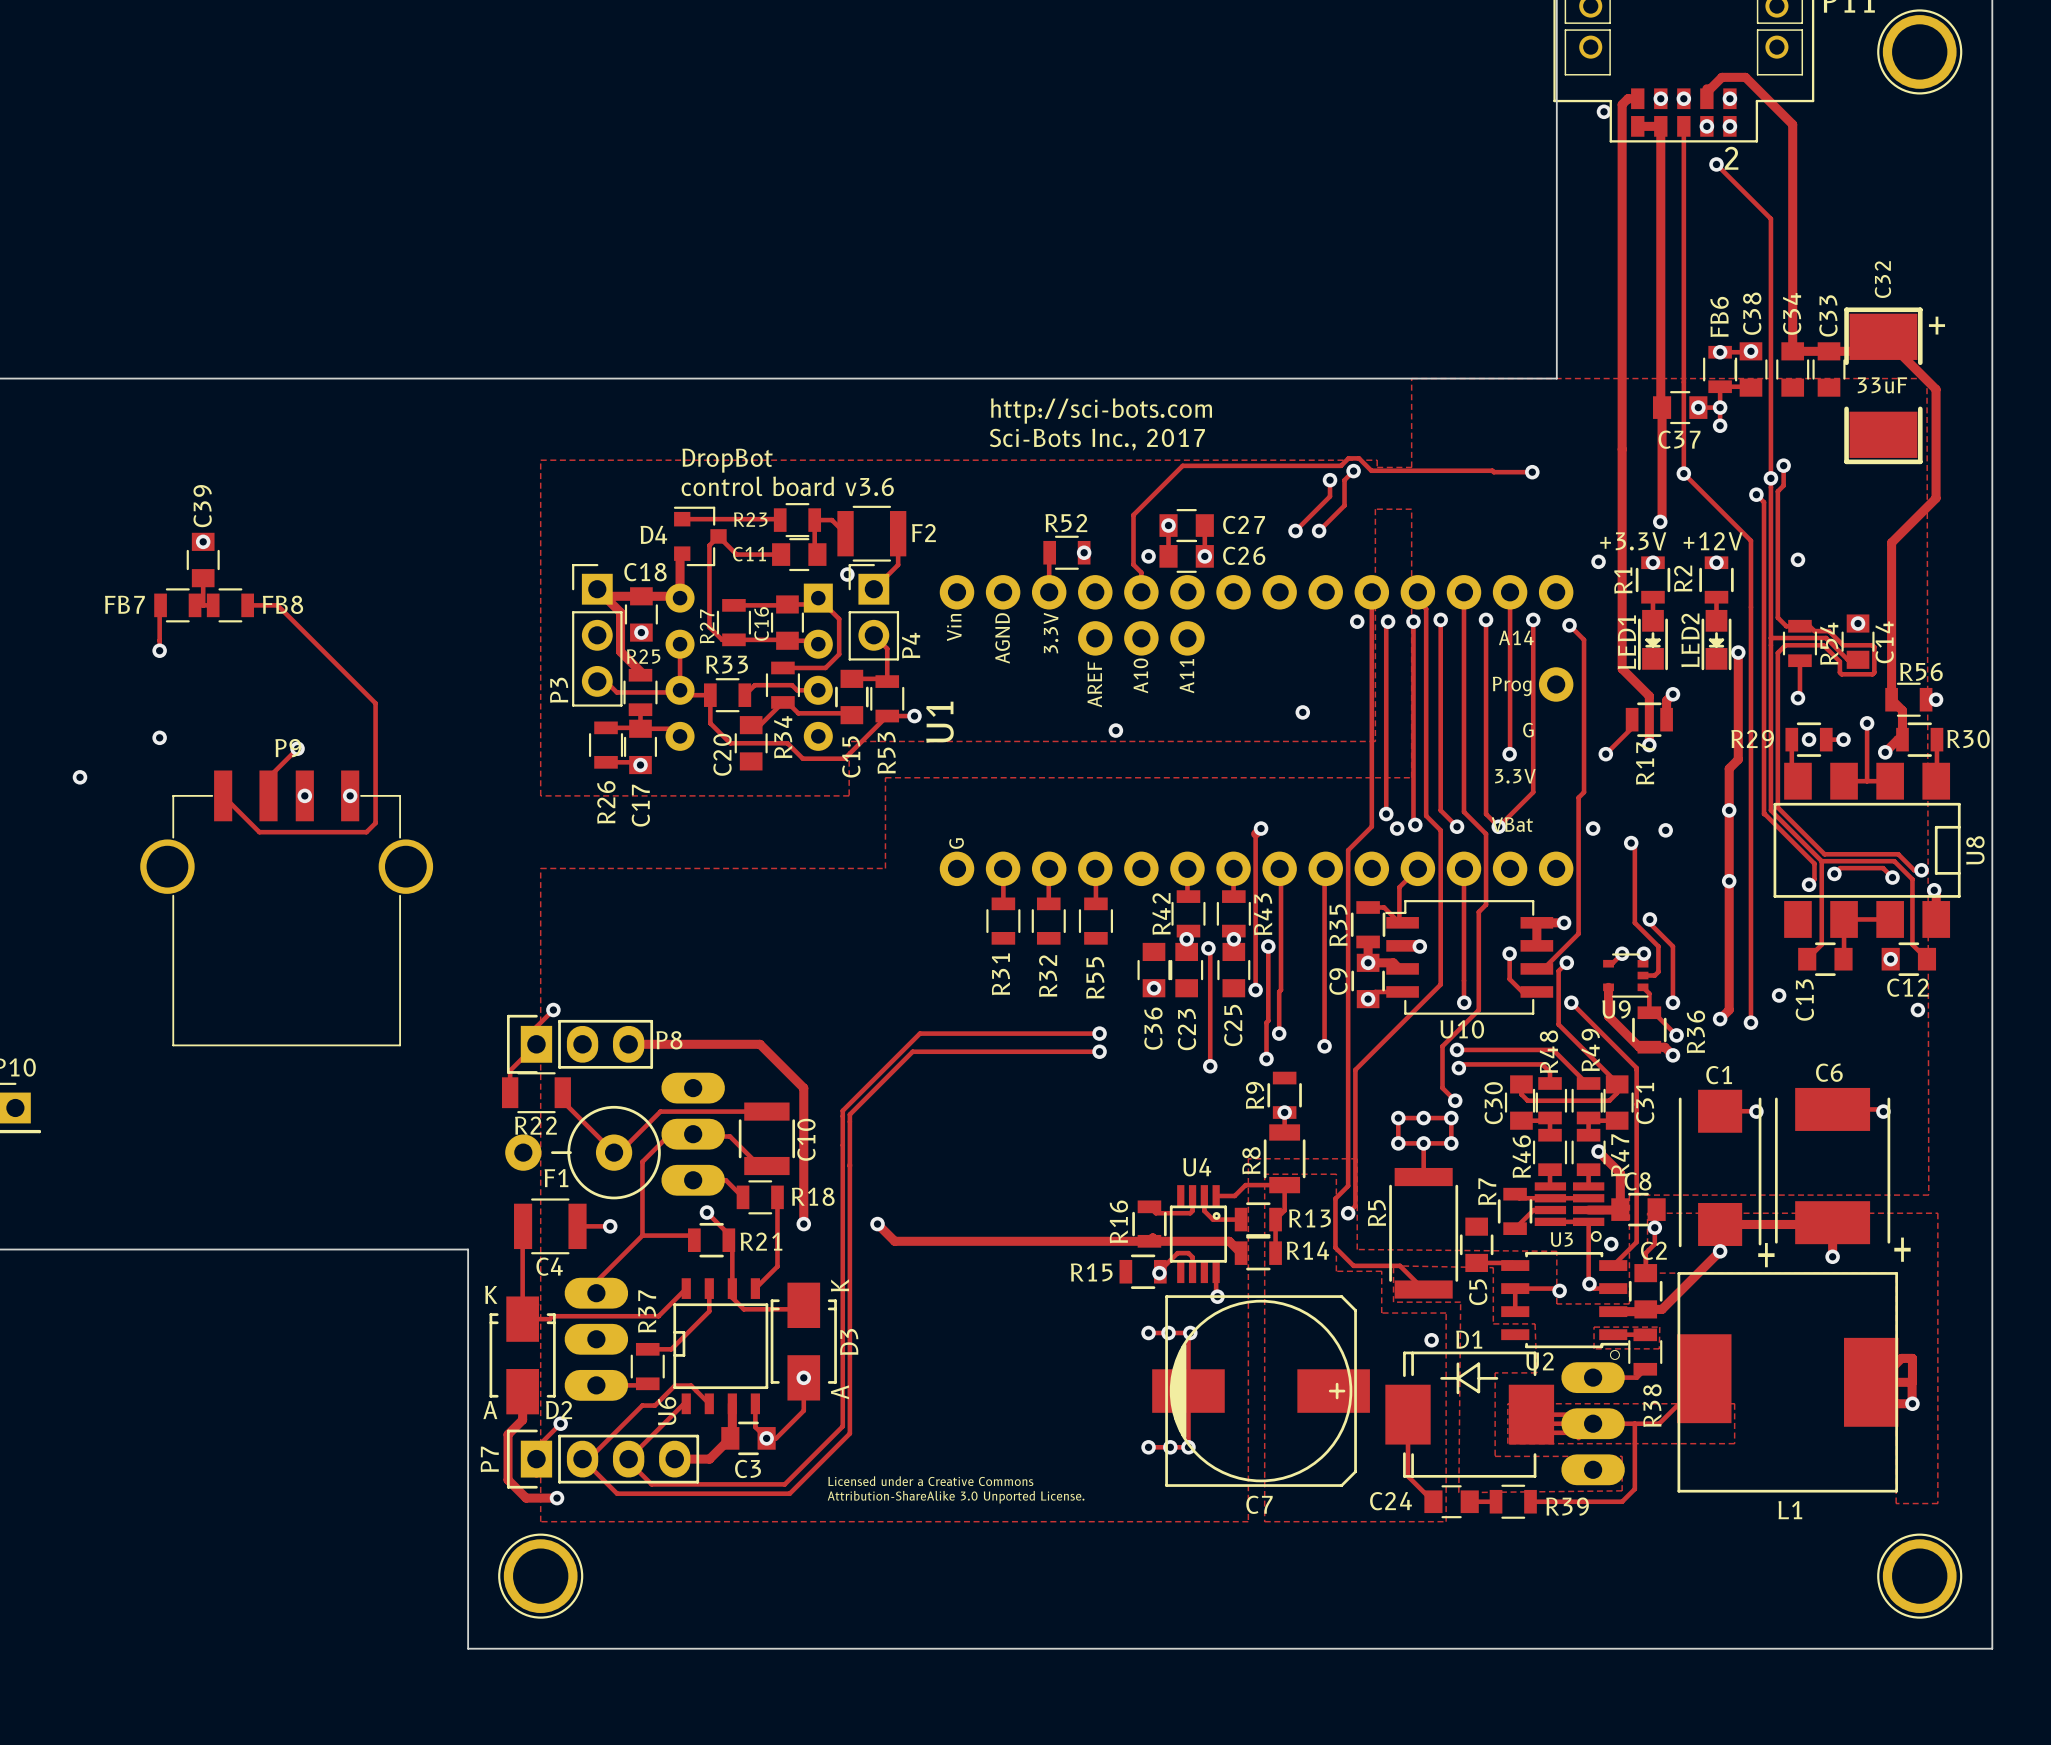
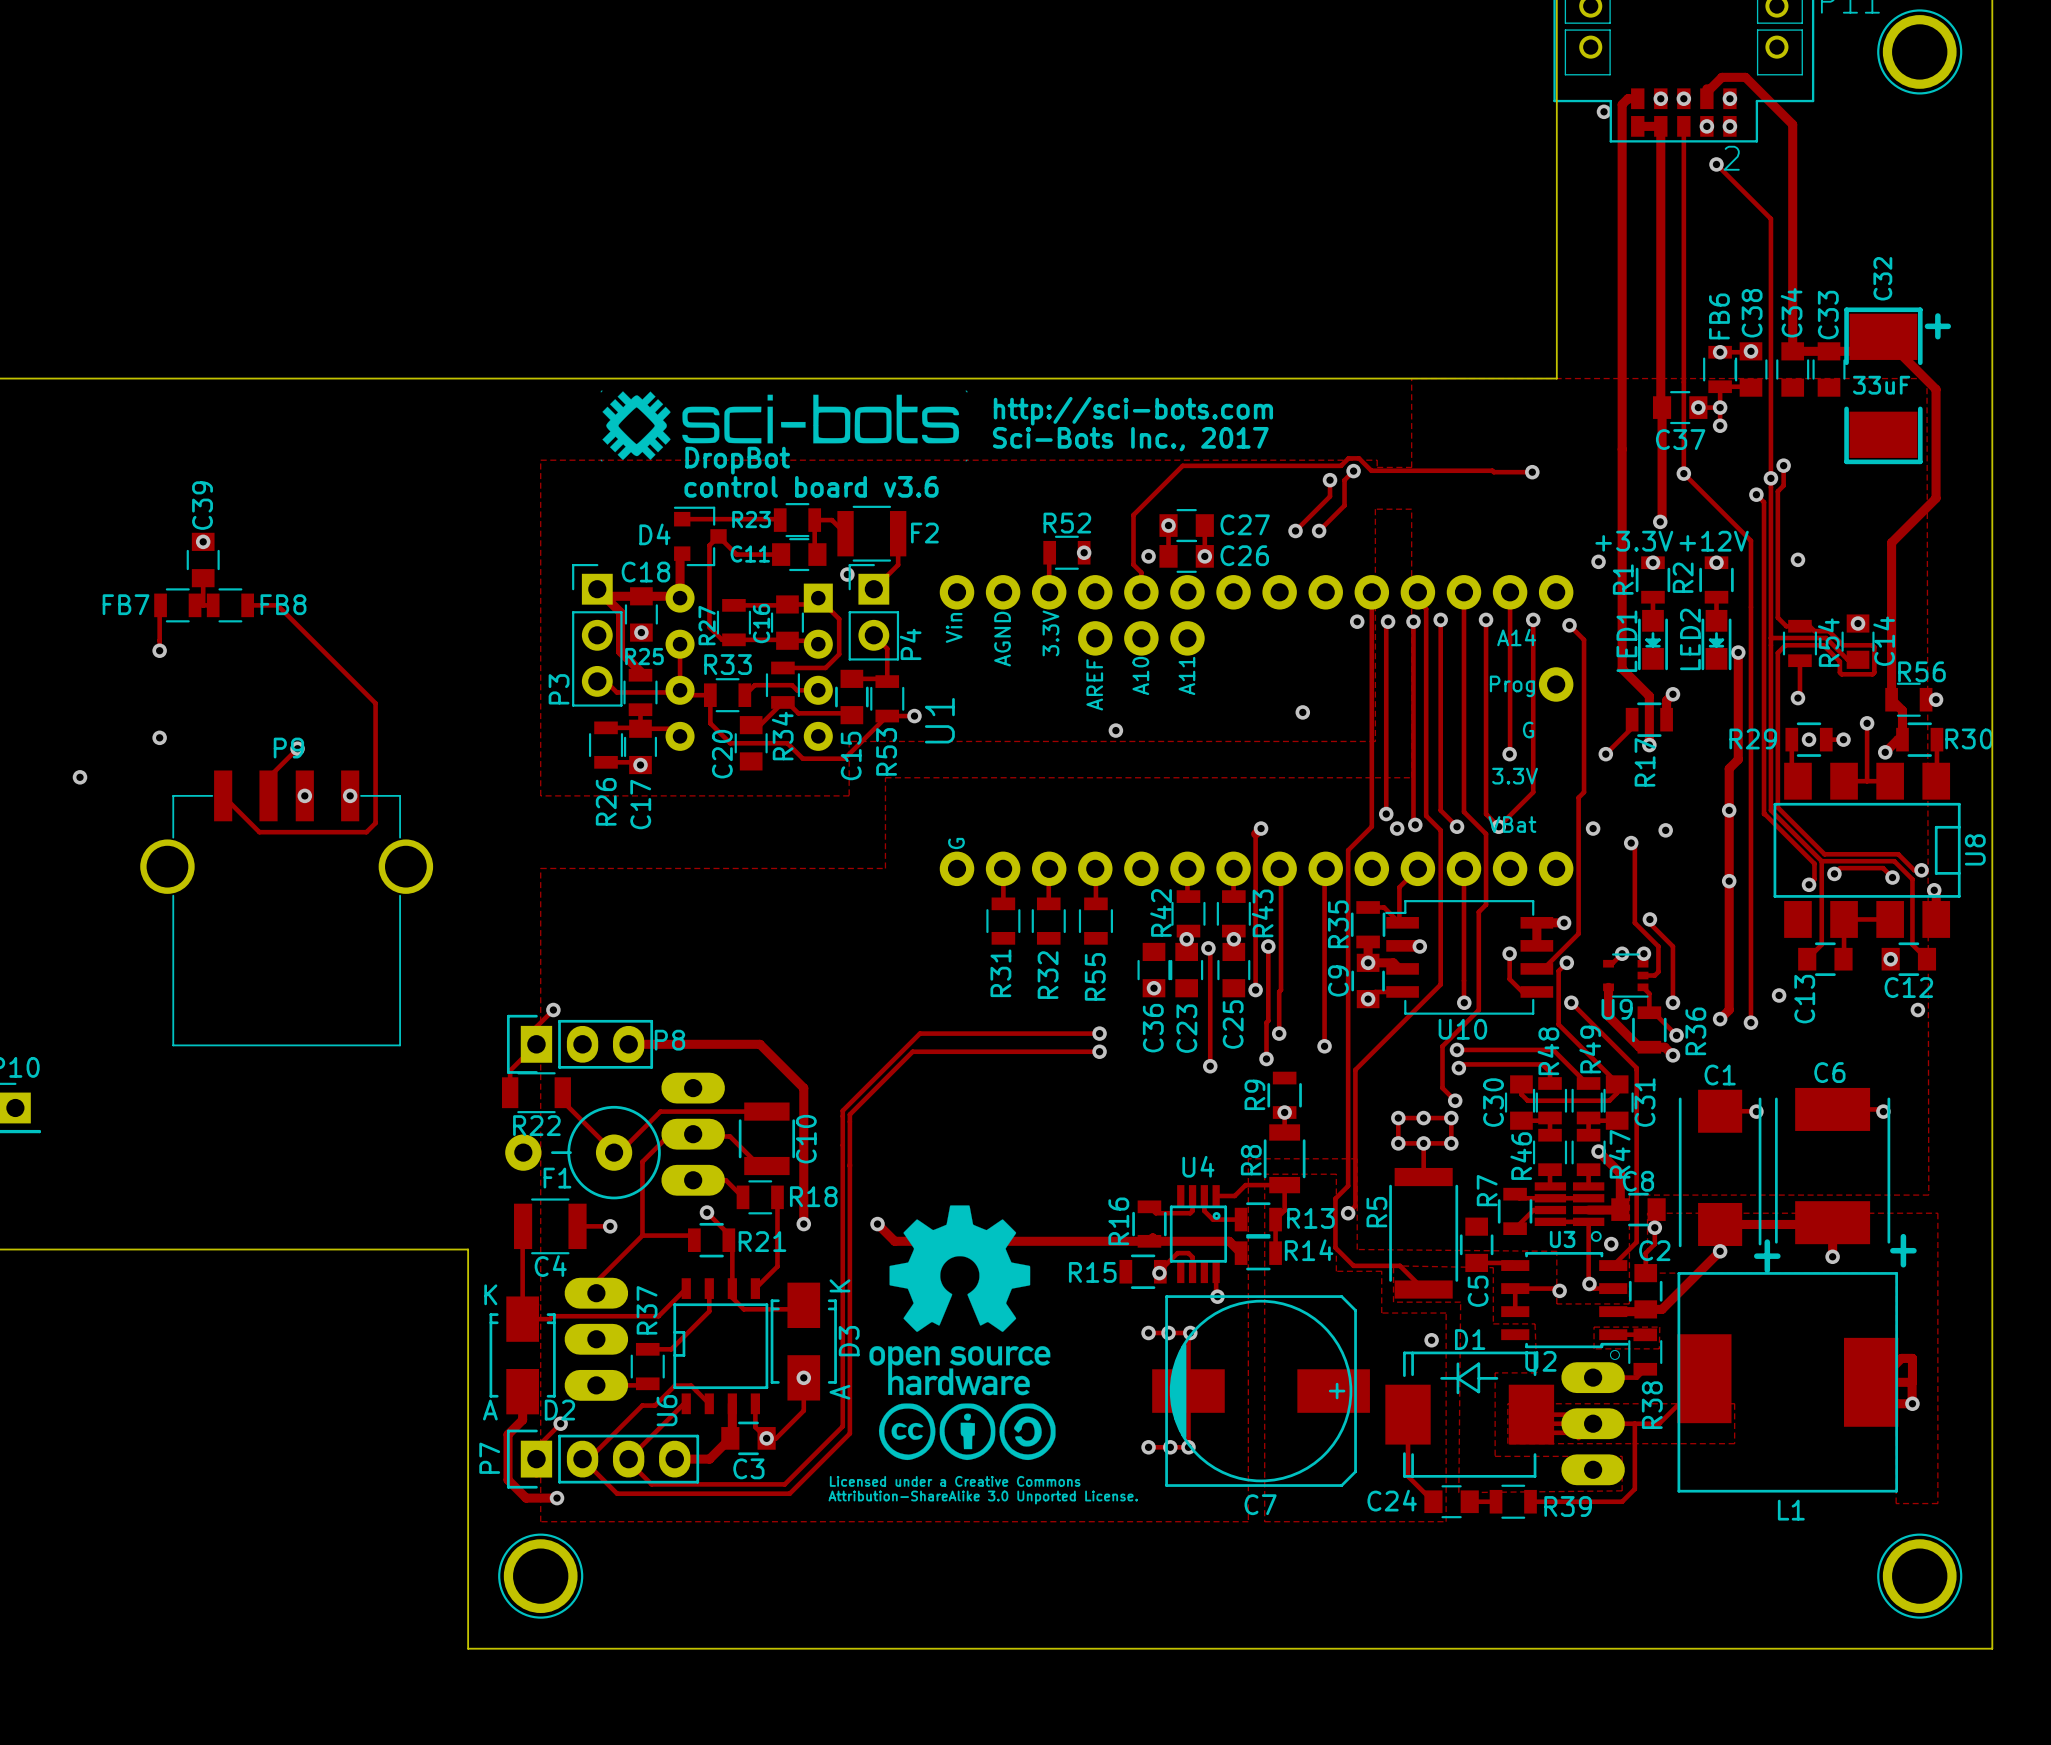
drawing: none -> [600, 390, 968, 462]
drawing: none -> [869, 1205, 1056, 1461]

